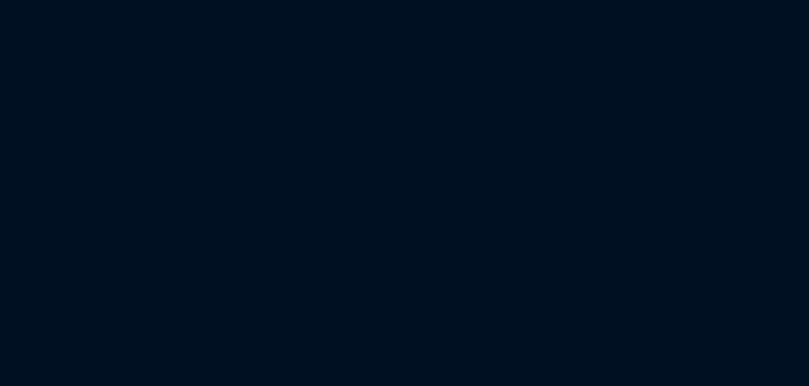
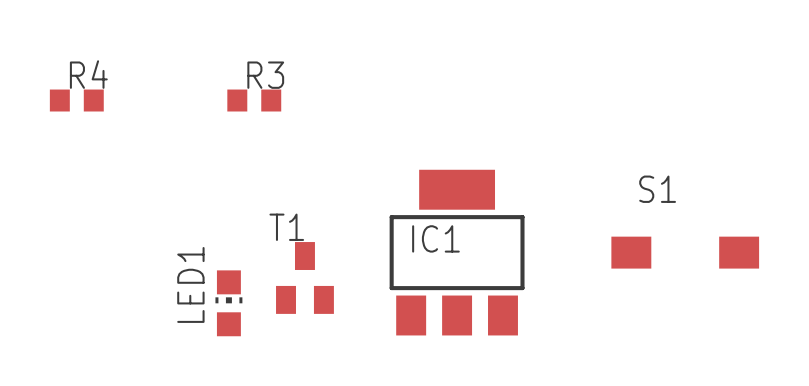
R4: none -> (76, 100)
R3: none -> (254, 100)
IC1: none -> (457, 252)
S1: none -> (685, 252)
T1: none -> (304, 277)
LED1: none -> (228, 303)

